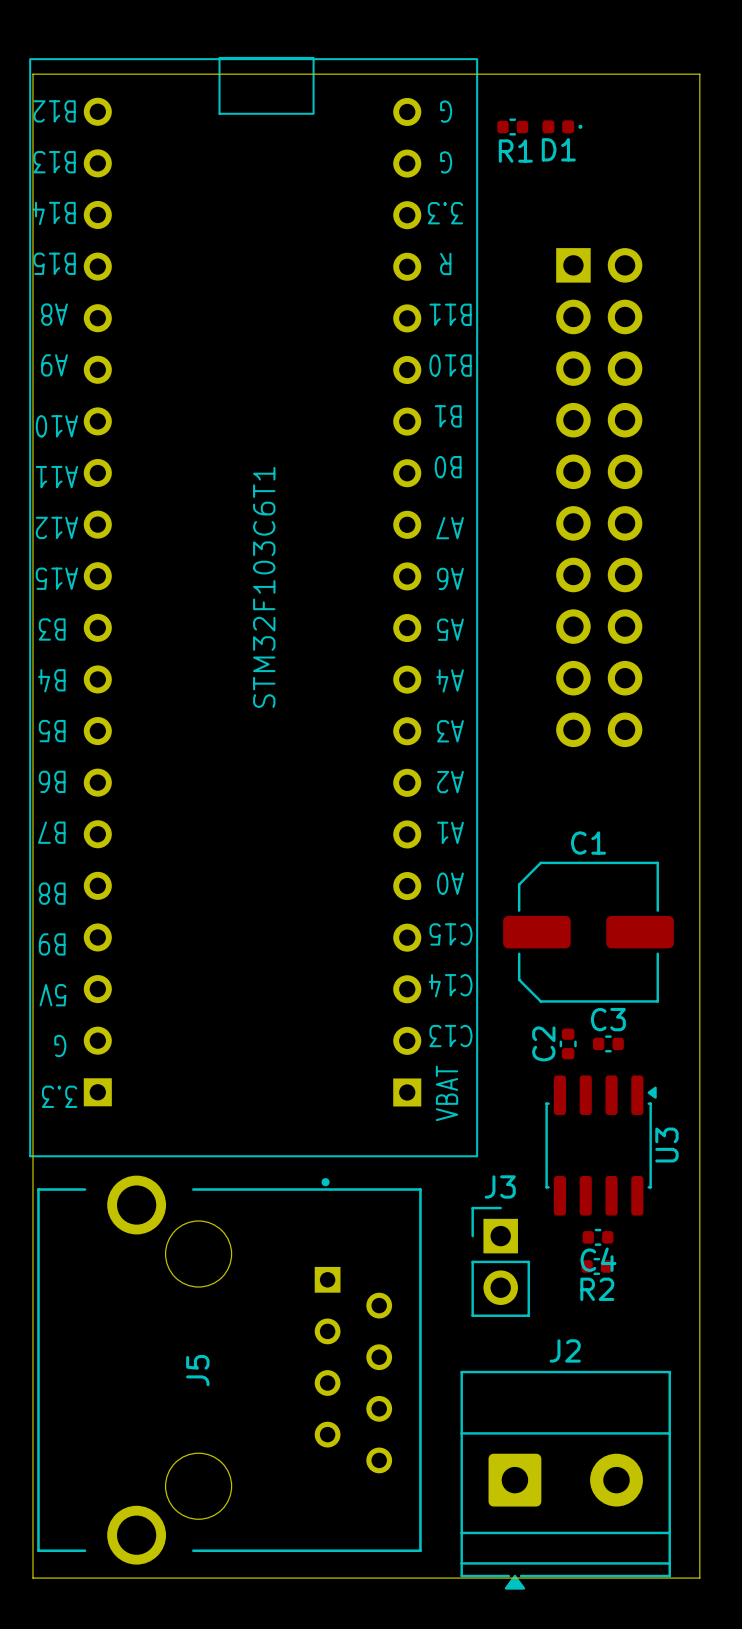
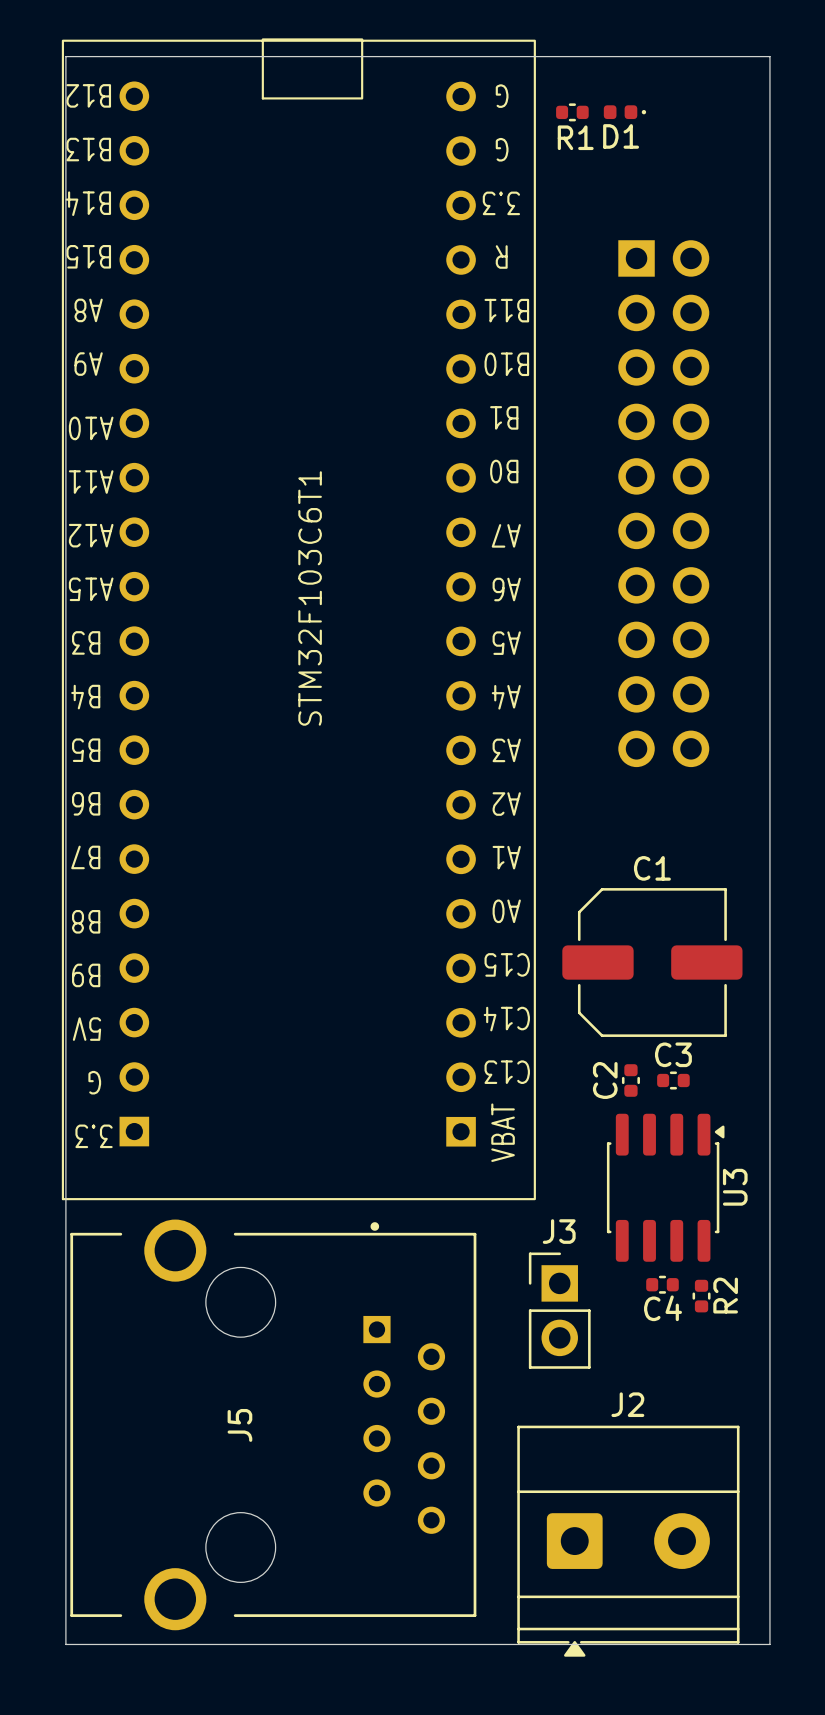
R2 rotation: 0° (596, 1266) -> 90° clockwise (701, 1296)
R2 position: (596, 1266) -> (701, 1296)

